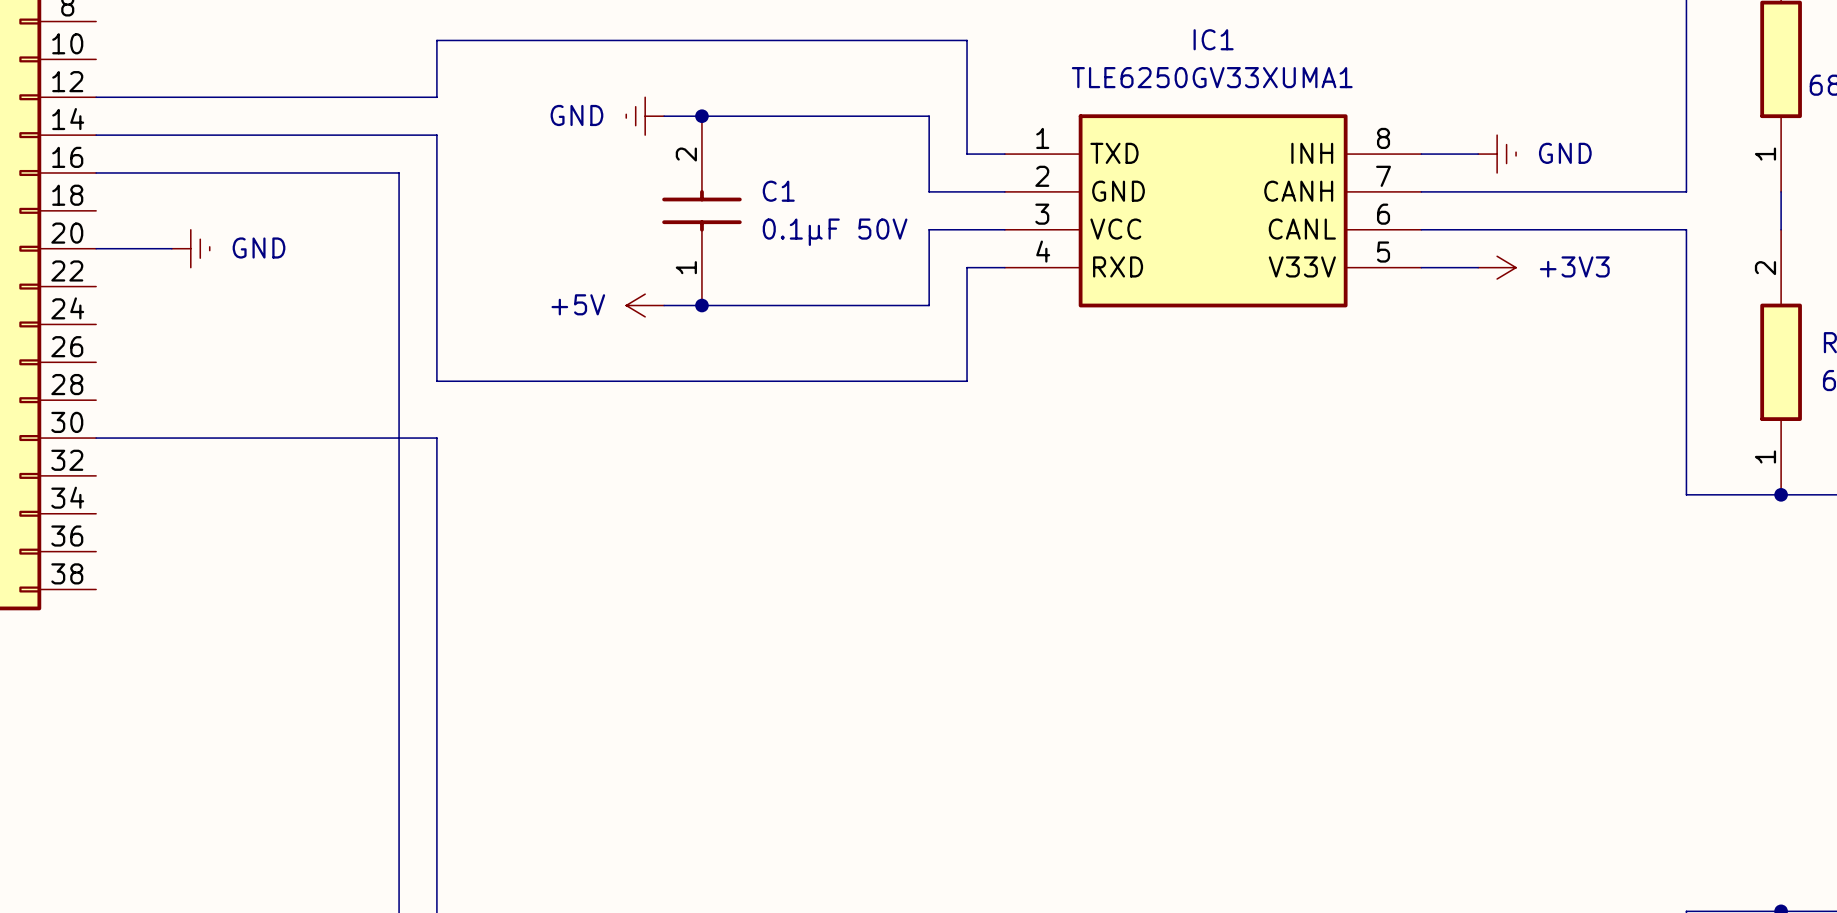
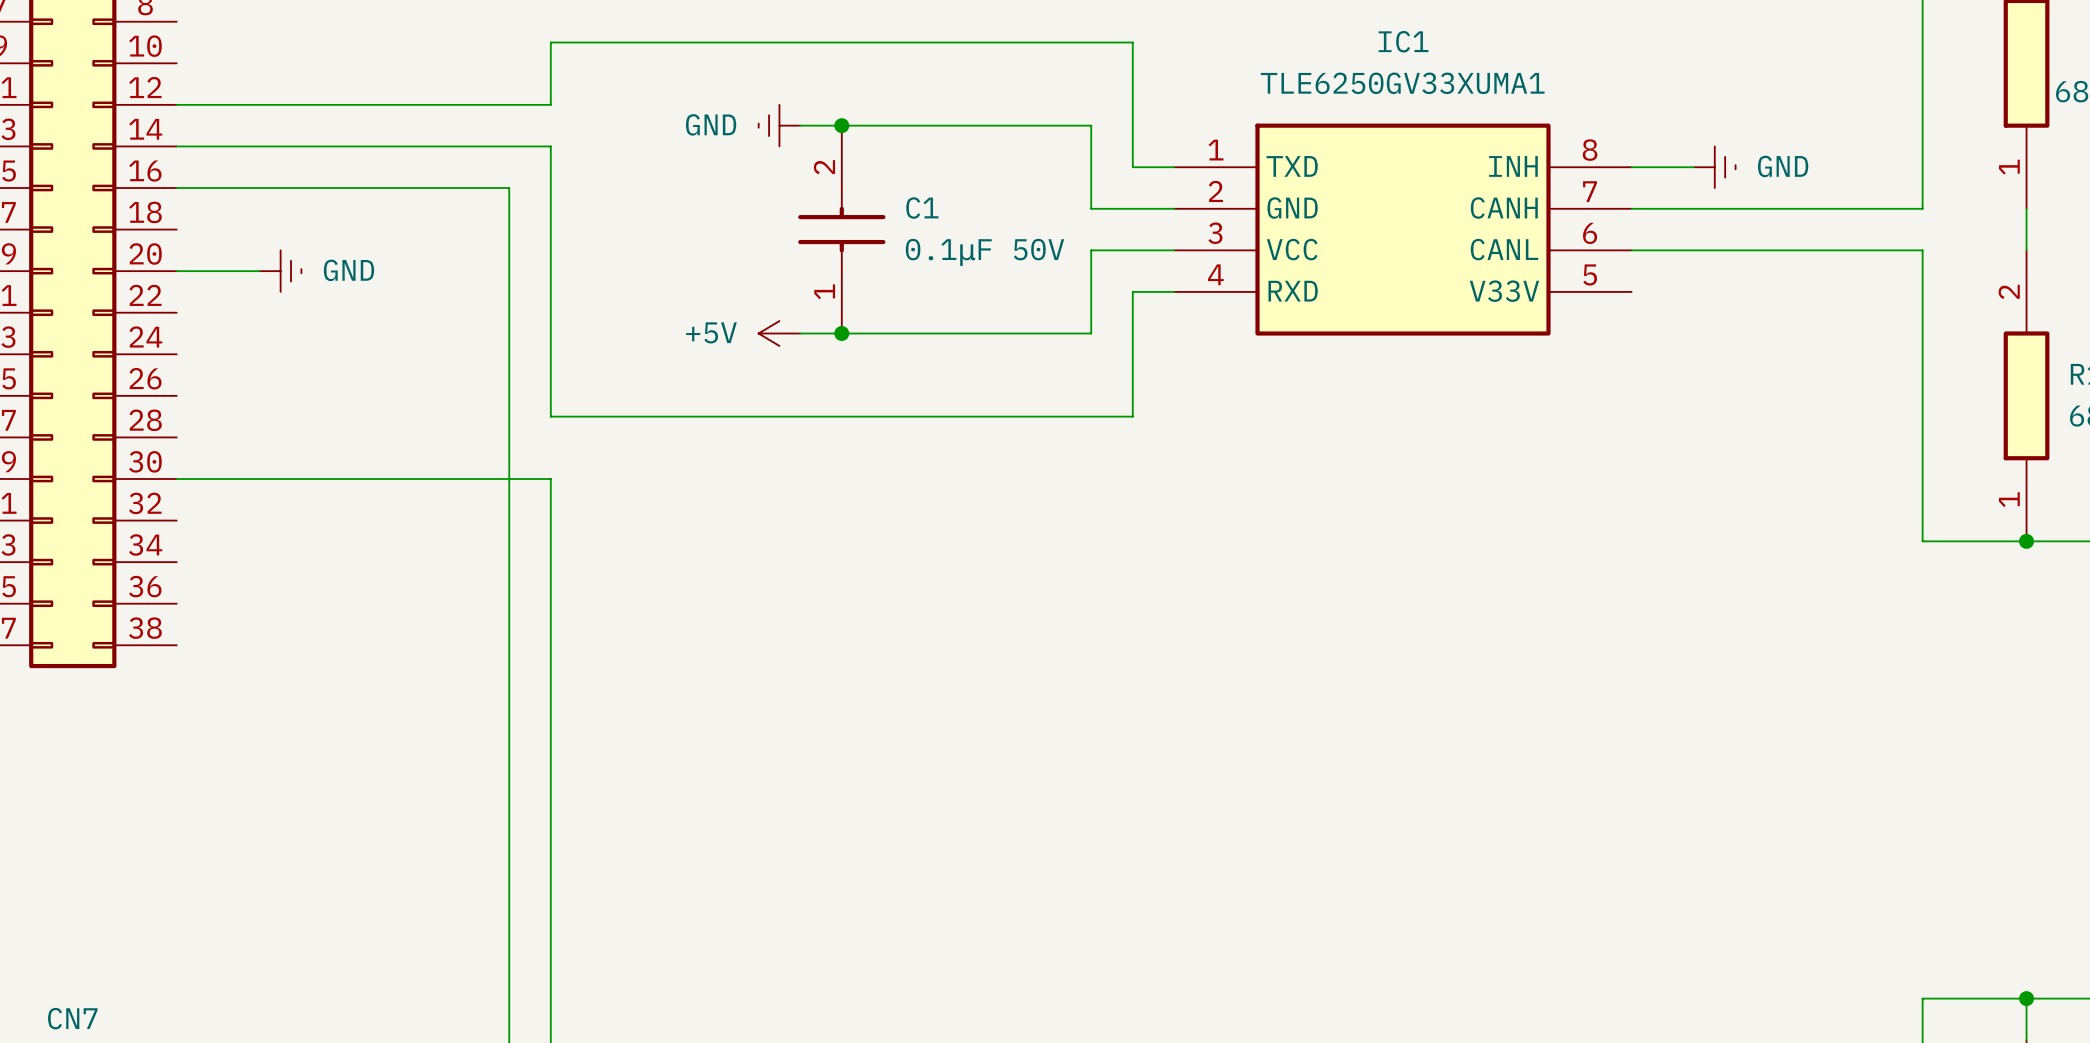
wire: (1421, 267) (1478, 267) -> none
power symbol: +3V3 (1497, 267) -> none

